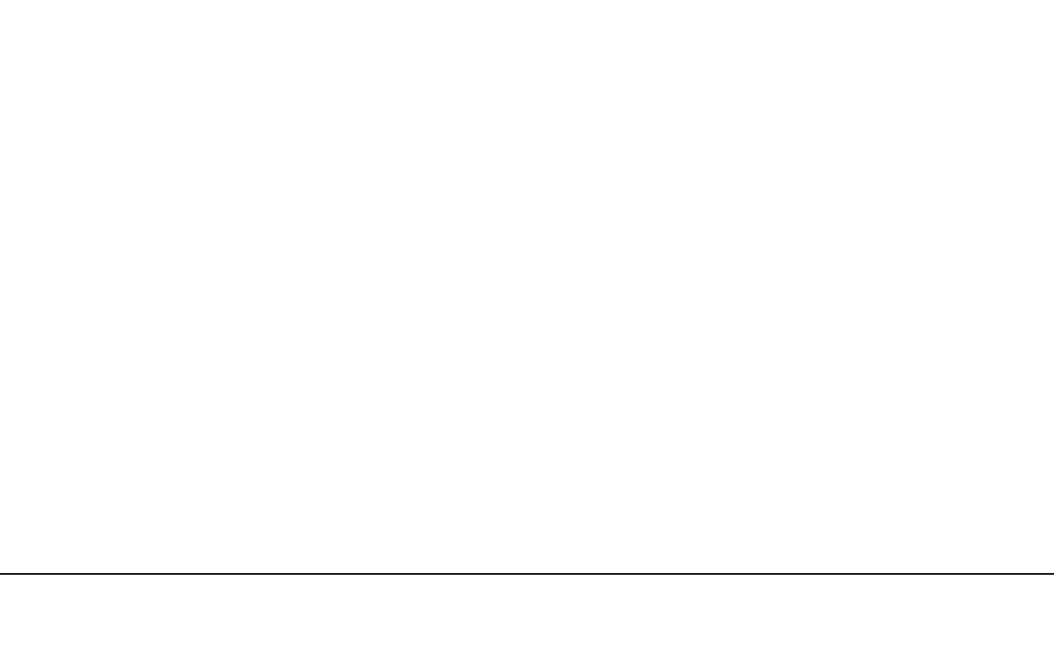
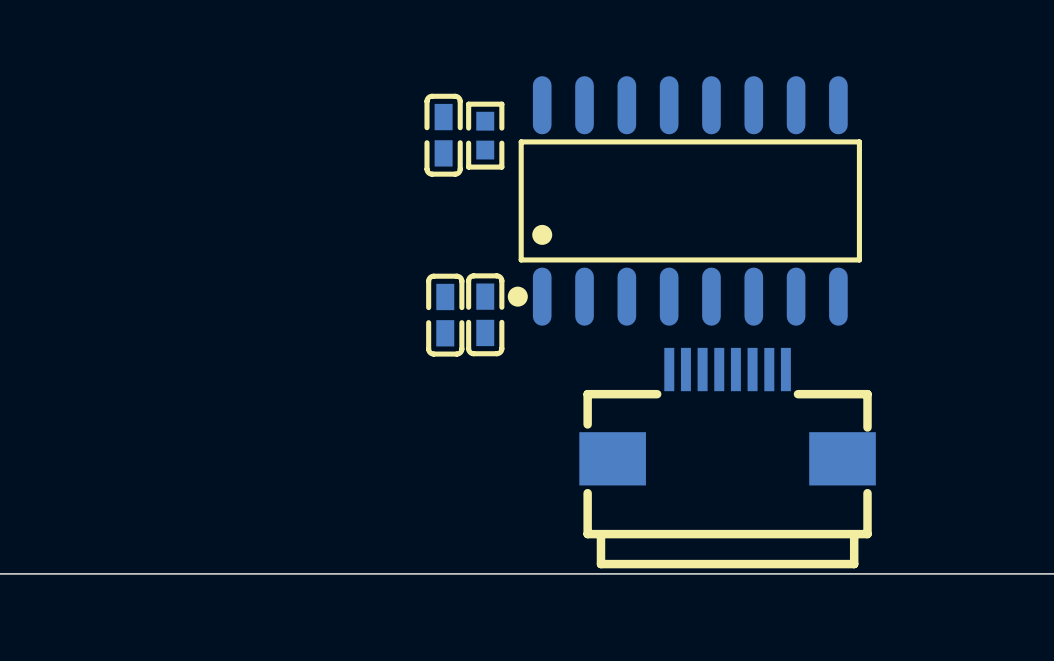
part: none -> (443, 135)
part: none -> (485, 135)
part: none -> (684, 200)
part: none -> (485, 314)
part: none -> (445, 315)
part: none -> (727, 458)

